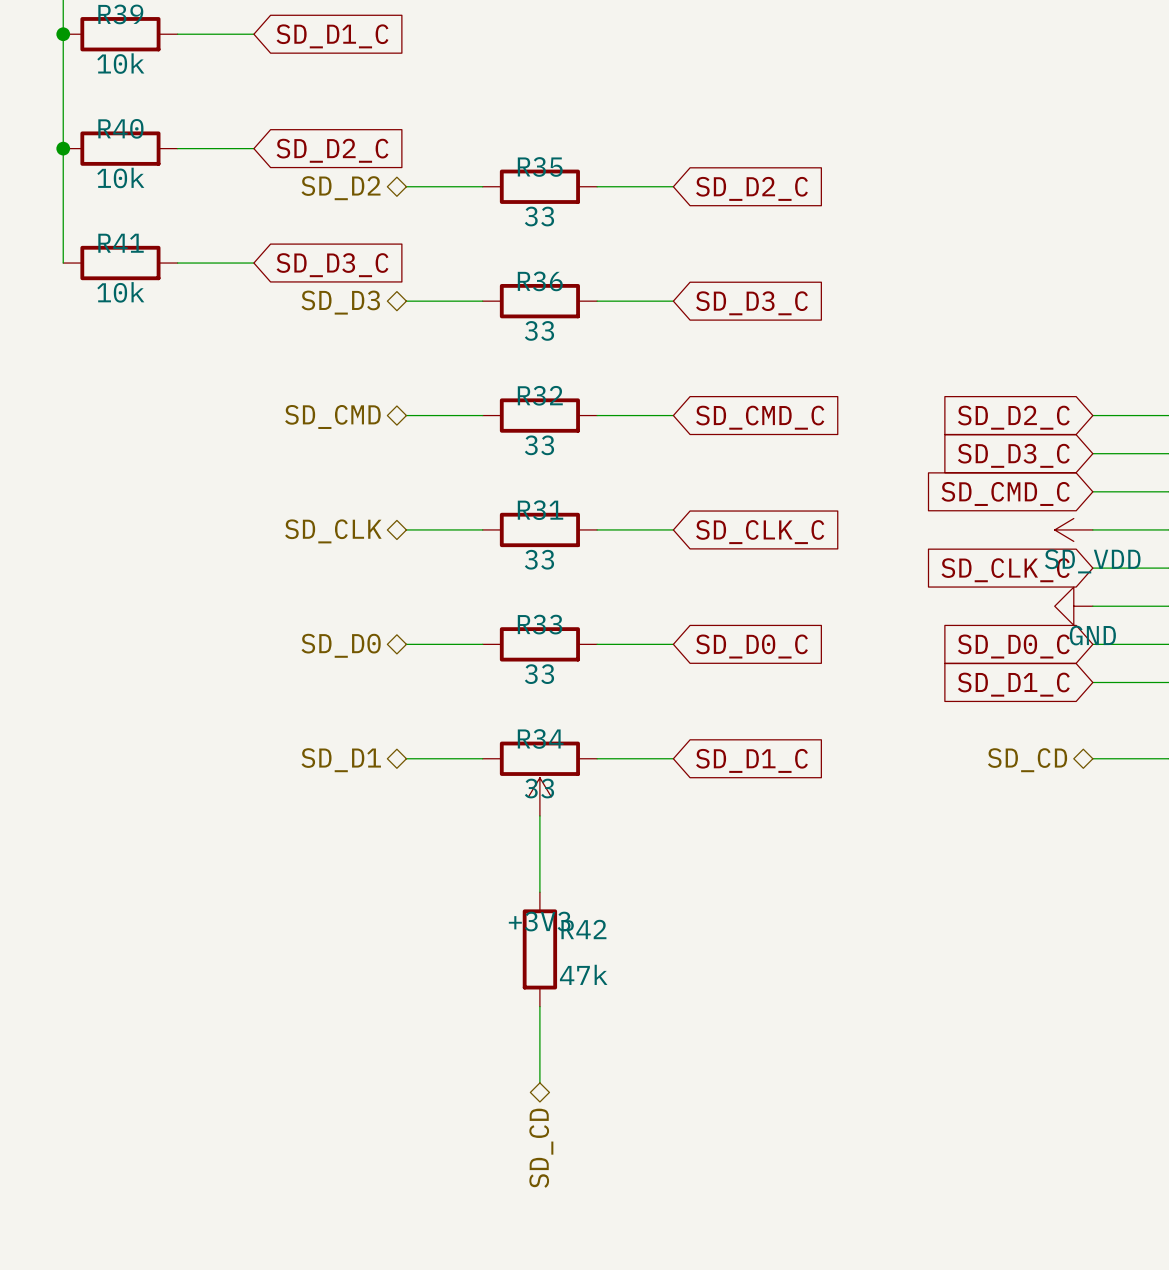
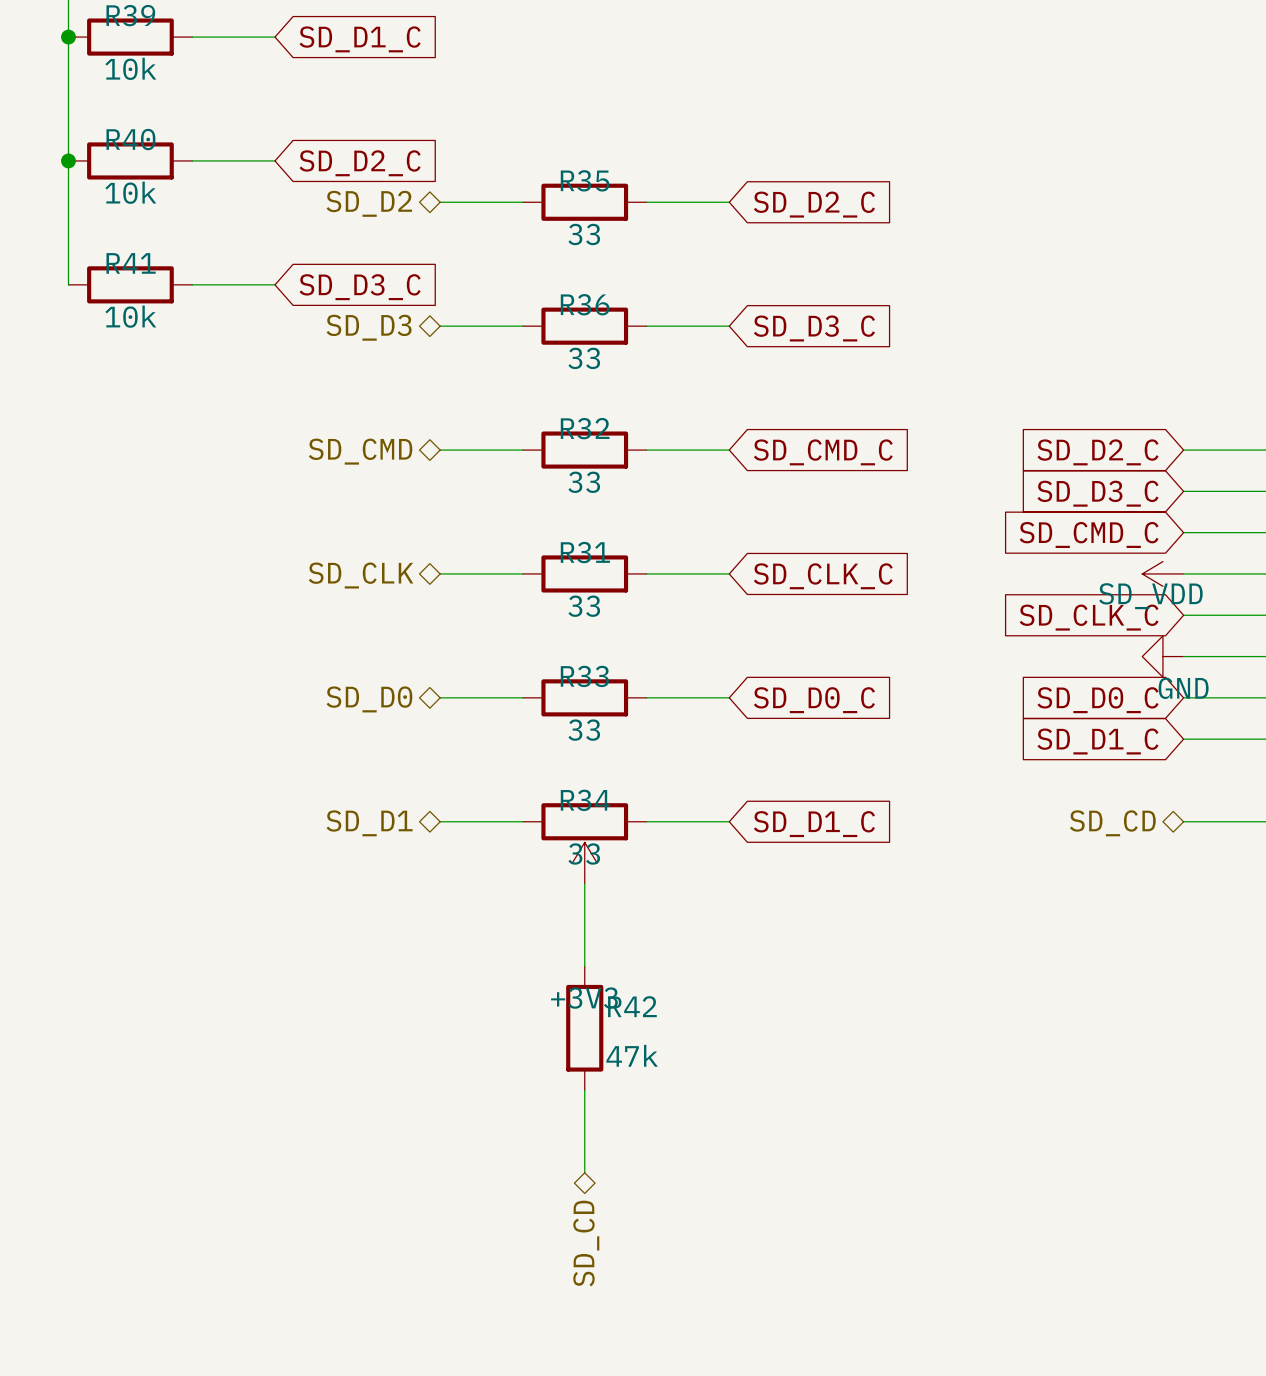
power symbol text position: SD_VDD (1092, 561) -> SD_VDD (1150, 596)

